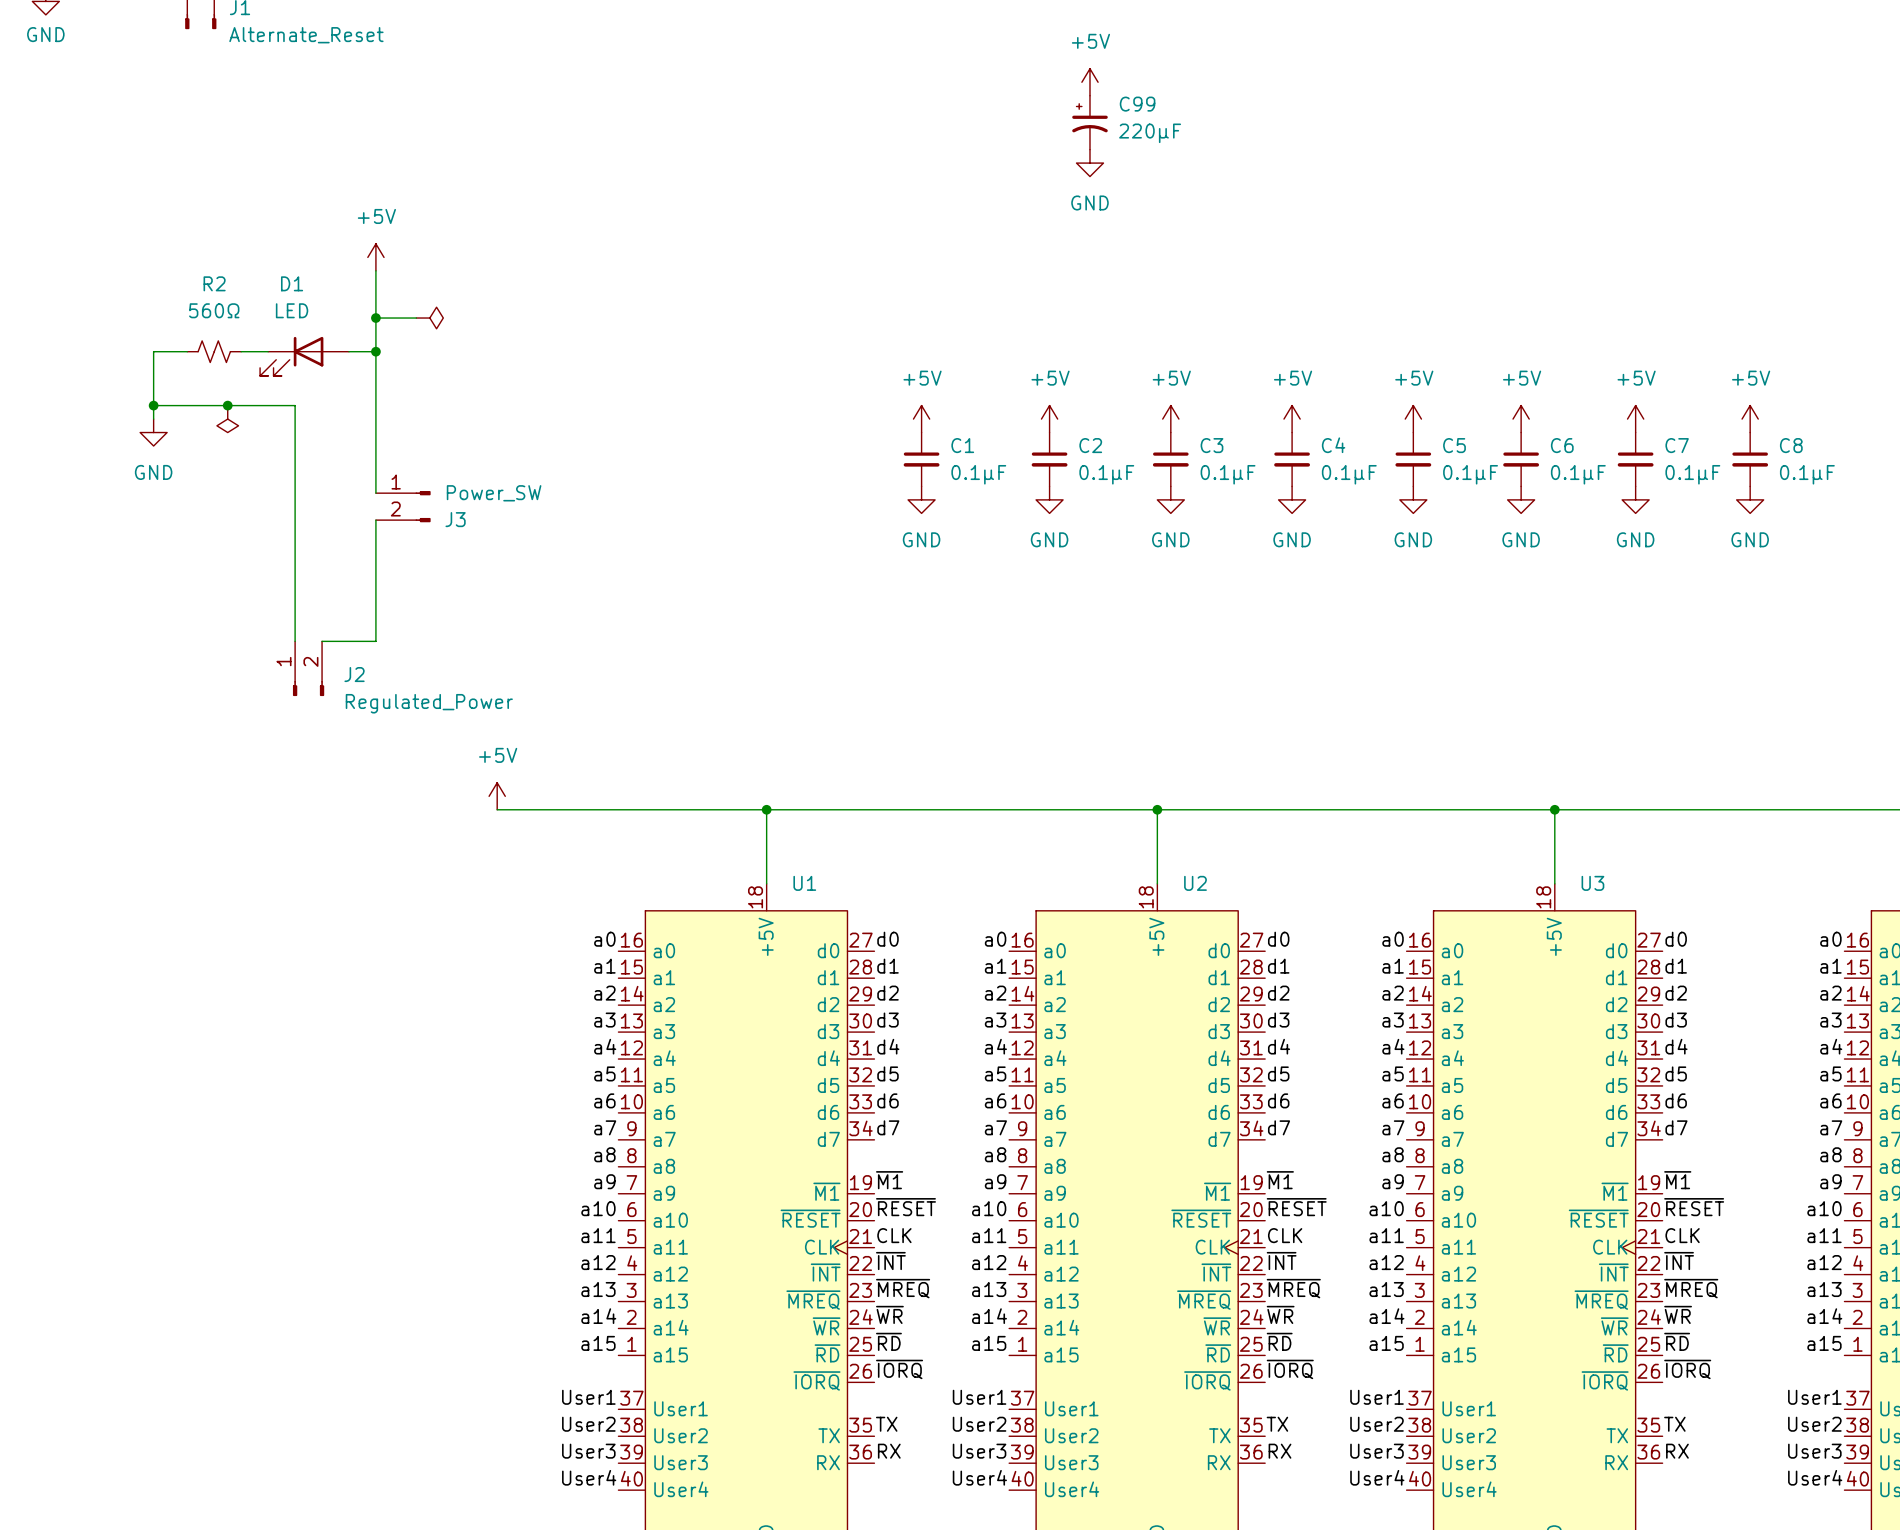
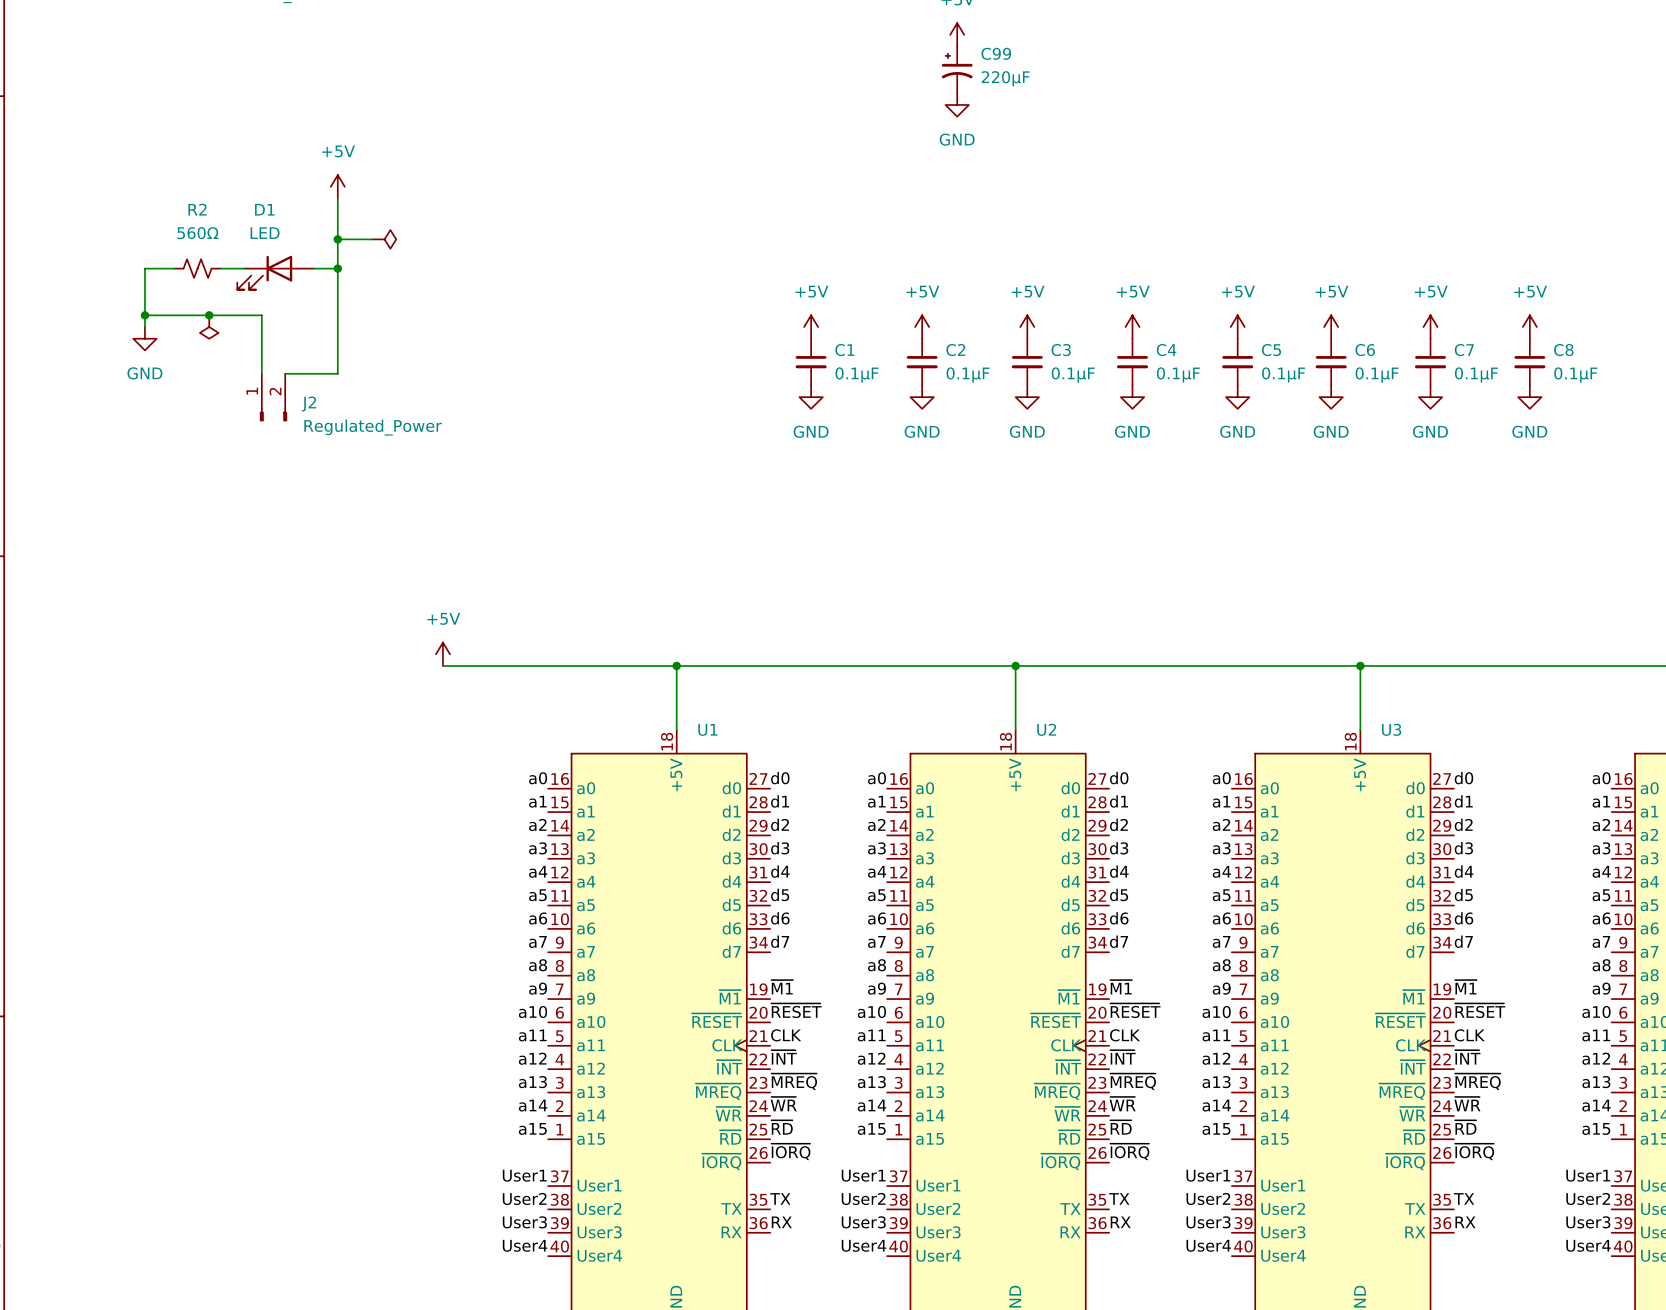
wire: (288, 405) (295, 405) (295, 641) -> (261, 315) (261, 373)
wire: (375, 472) (375, 493) -> (337, 373) (285, 373)
J3: Power_SW (403, 506) -> none
wire: (375, 520) (375, 641) (322, 641) -> none
J2 position: (308, 668) -> (273, 397)

